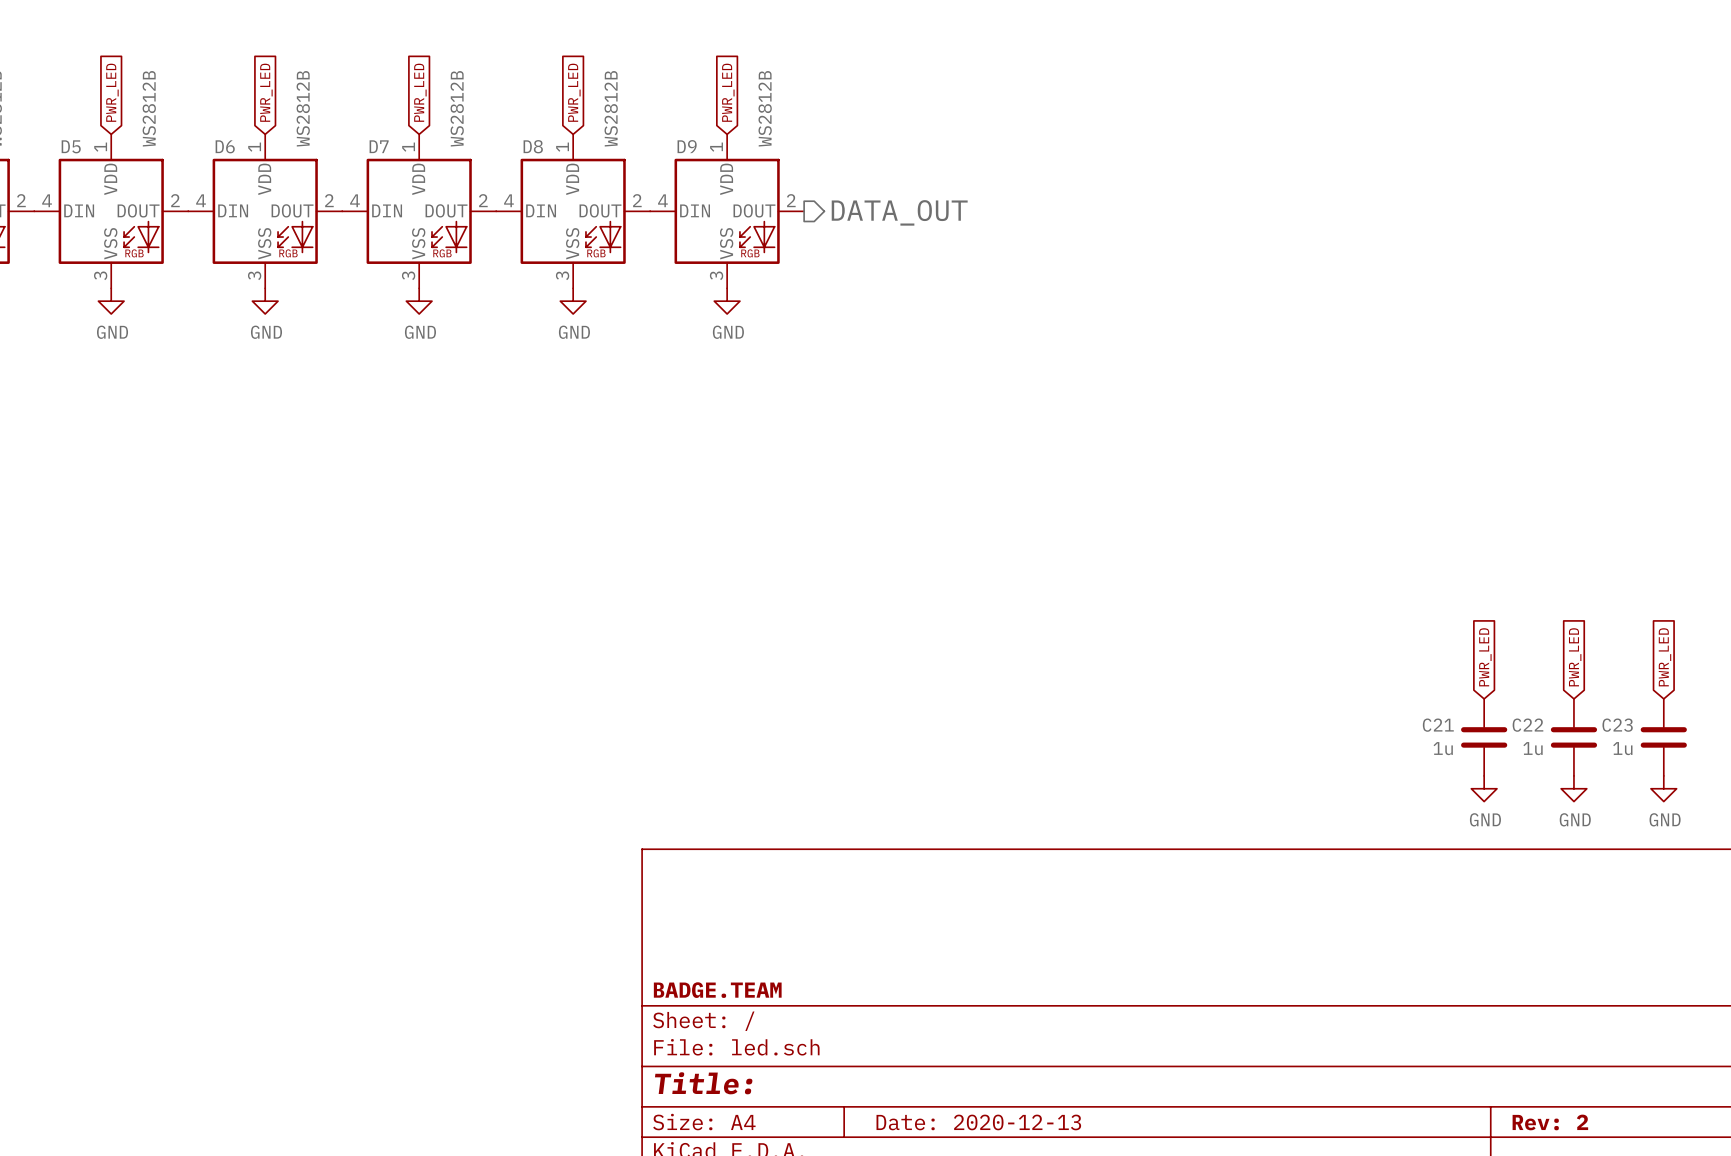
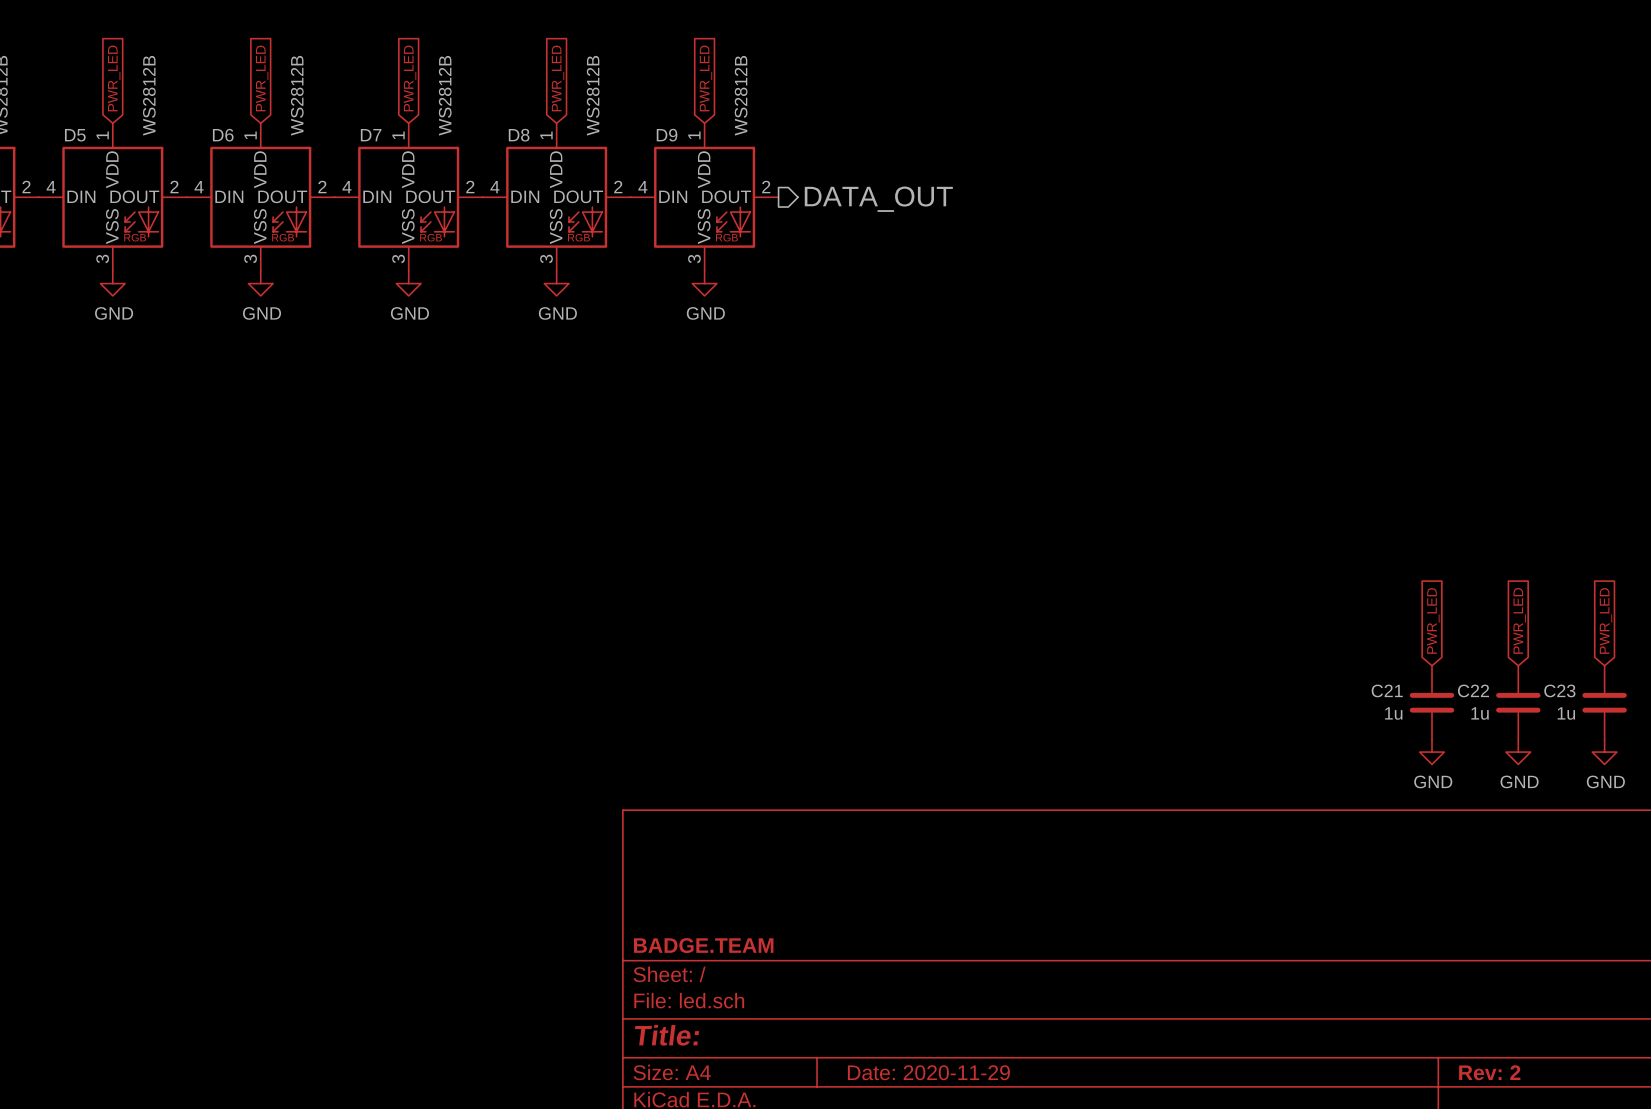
title block: Date: 2020-12-13 (978, 1122) -> Date: 2020-11-29 (928, 1072)

